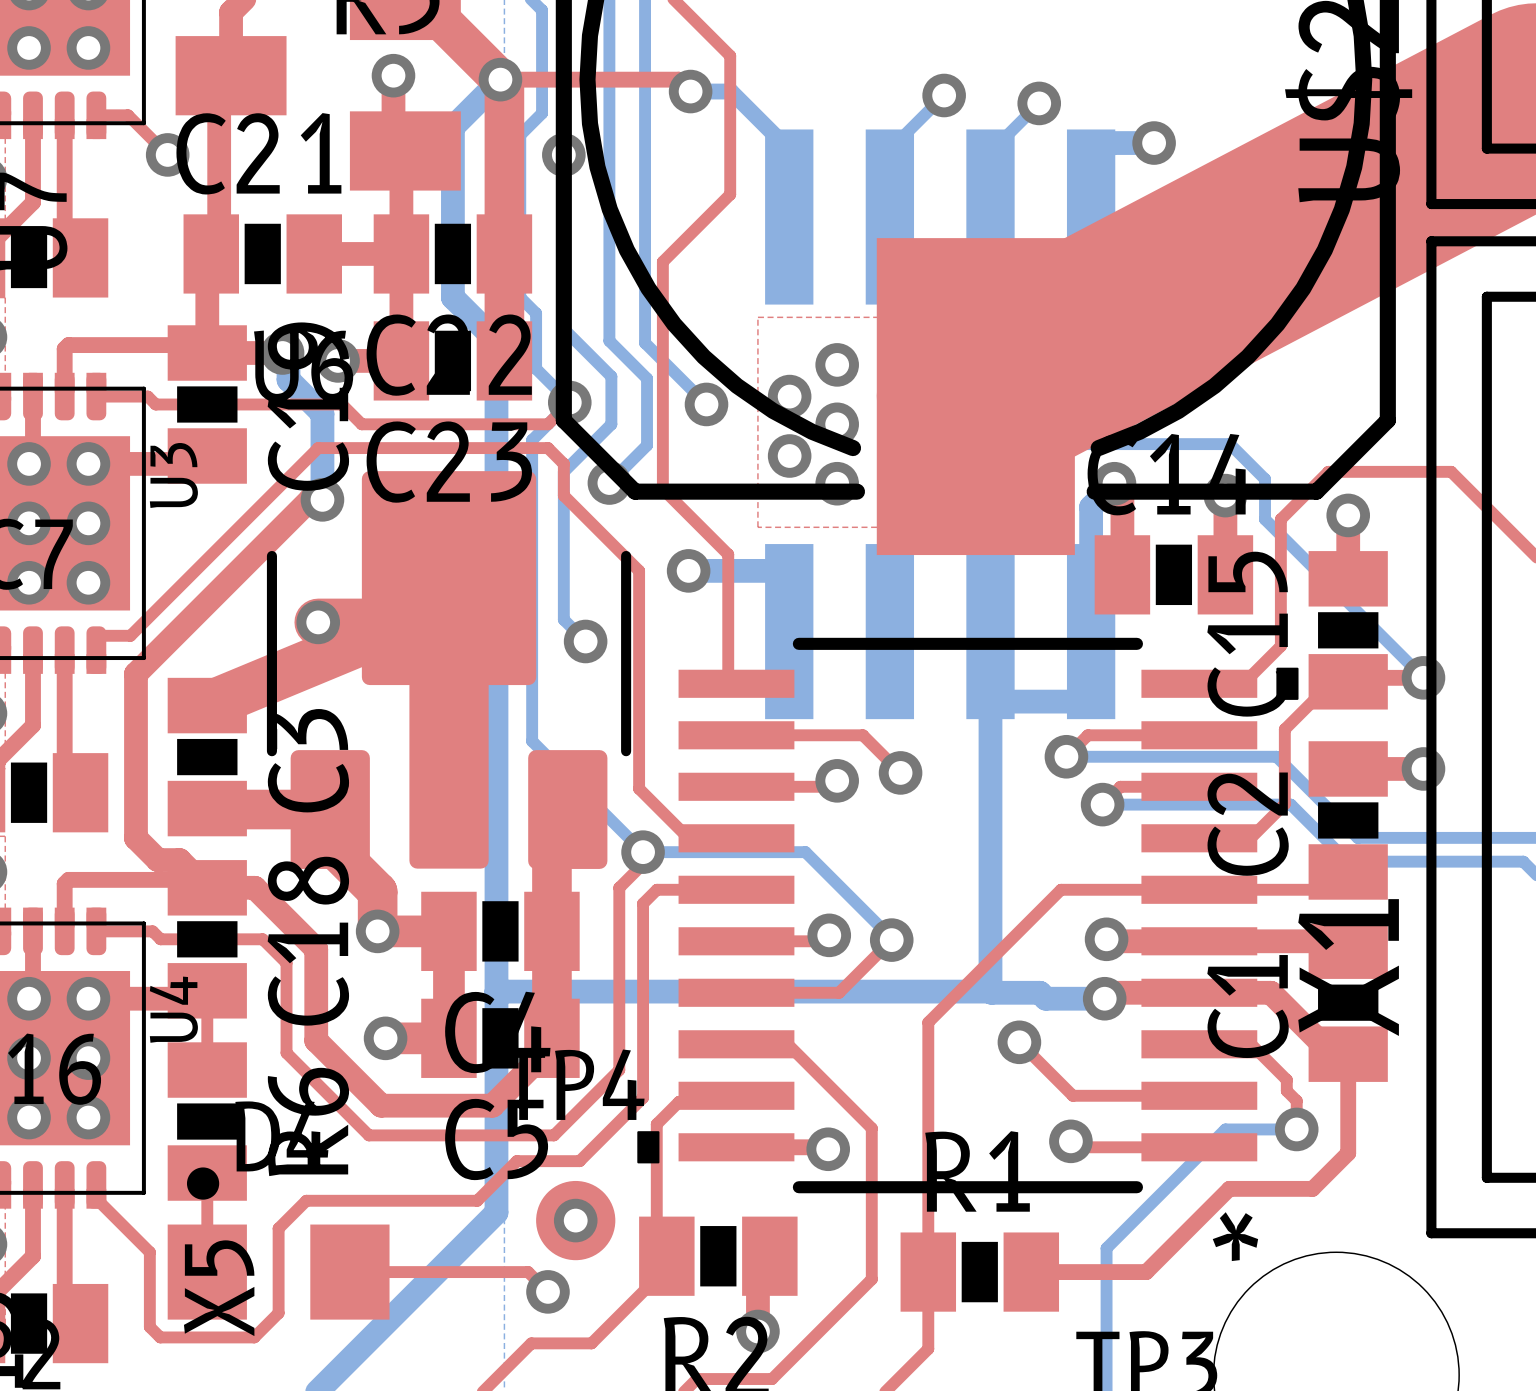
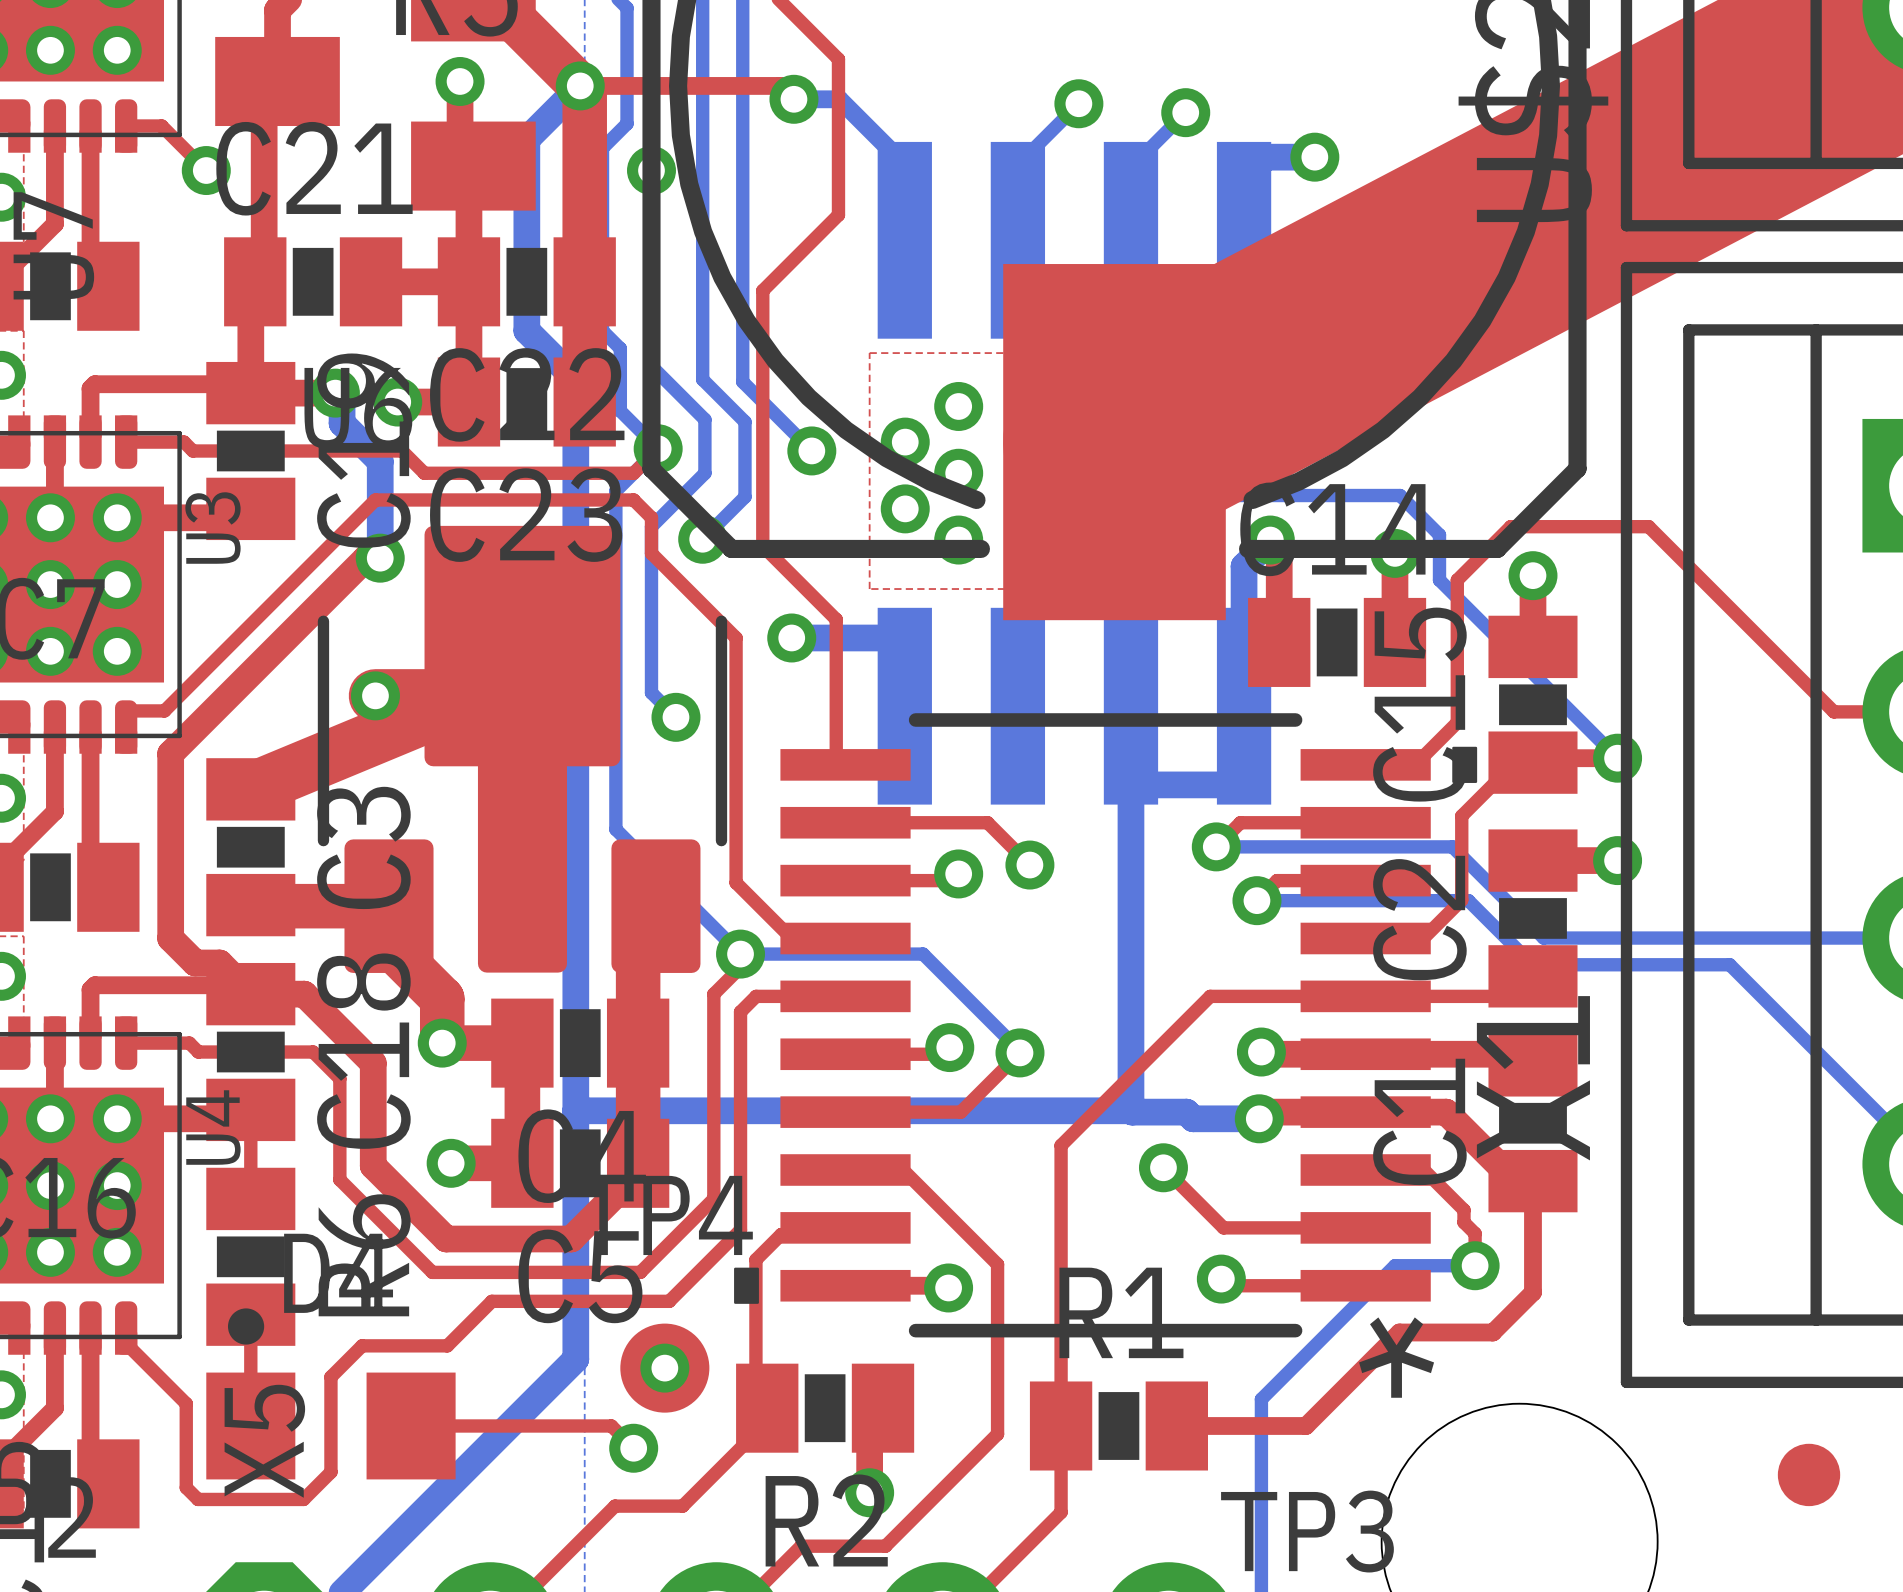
top track: (516, 1161) (477, 1200) (382, 1200) -> (598, 1301) (491, 1301) (447, 1345)

